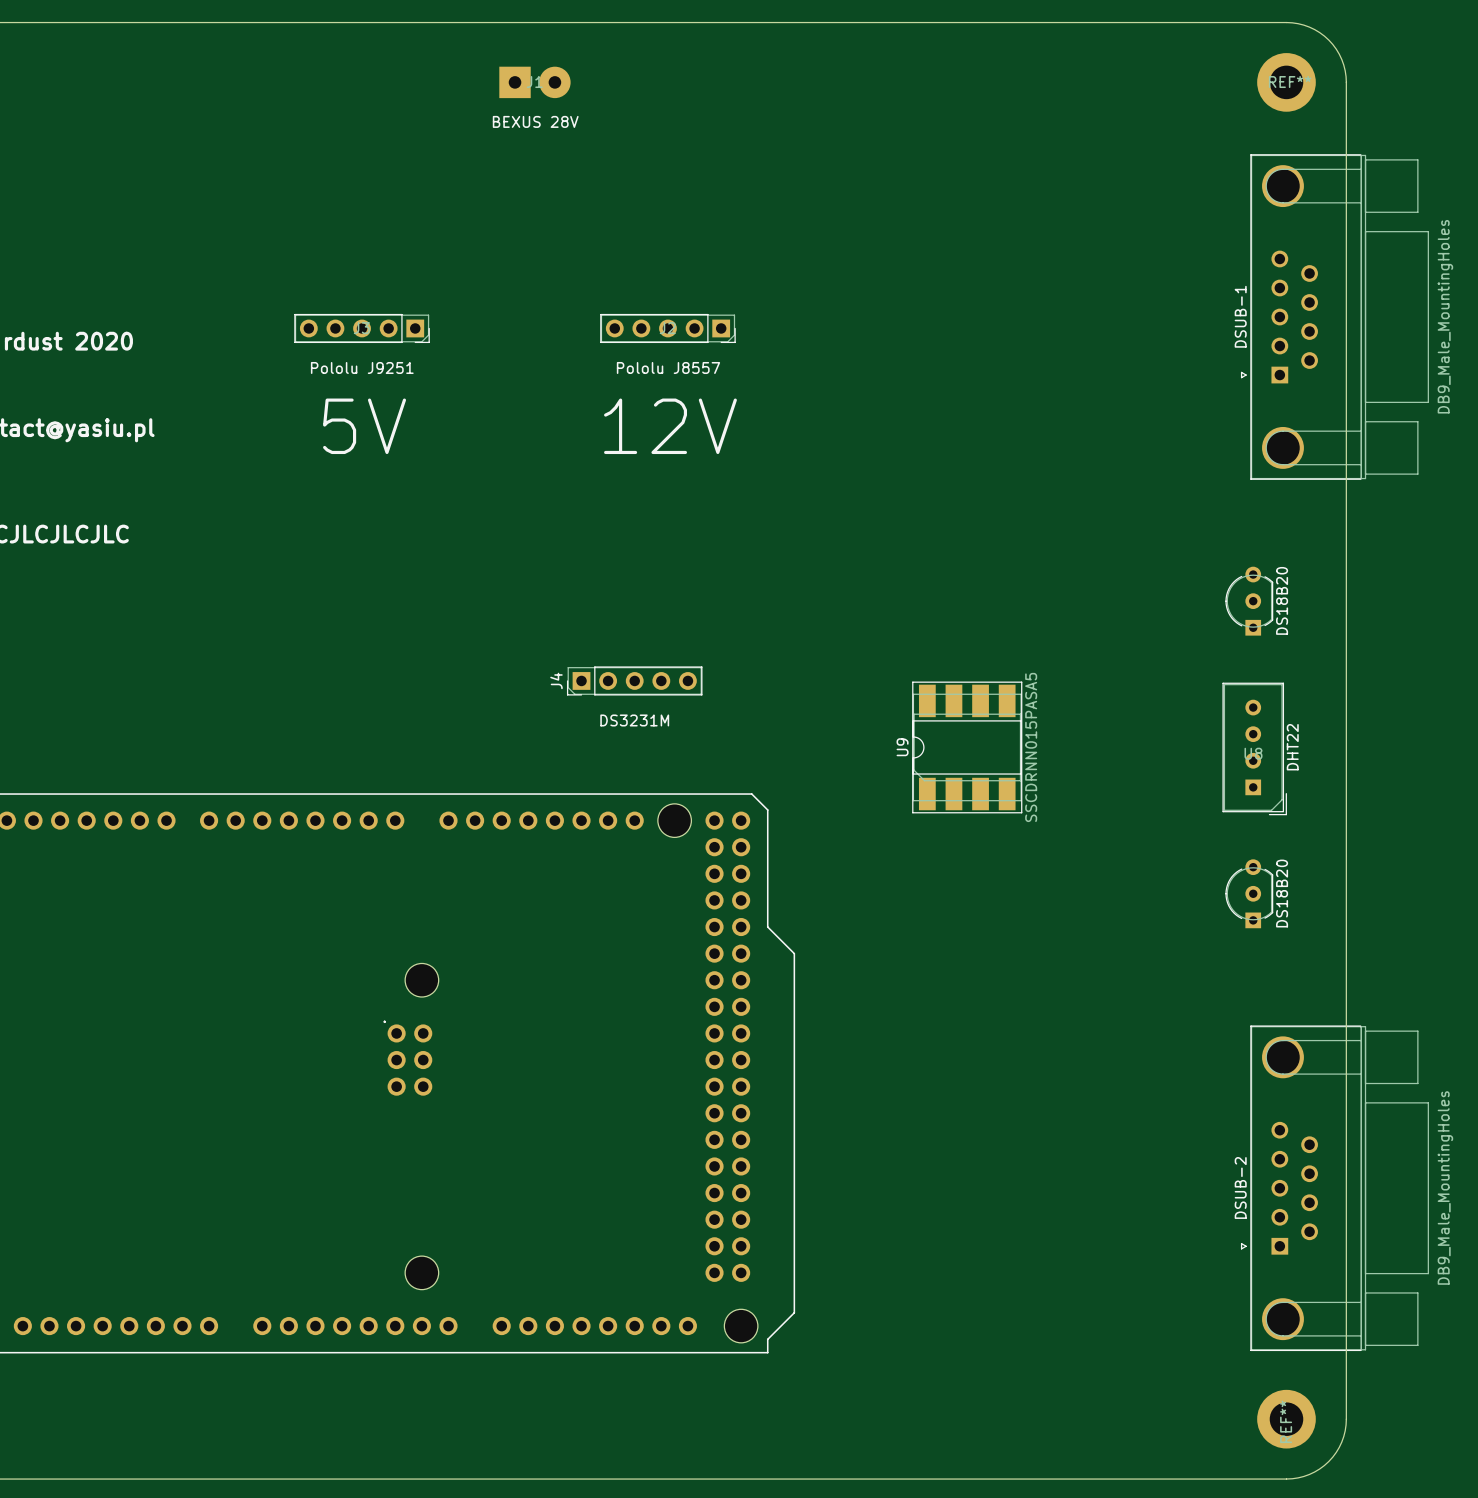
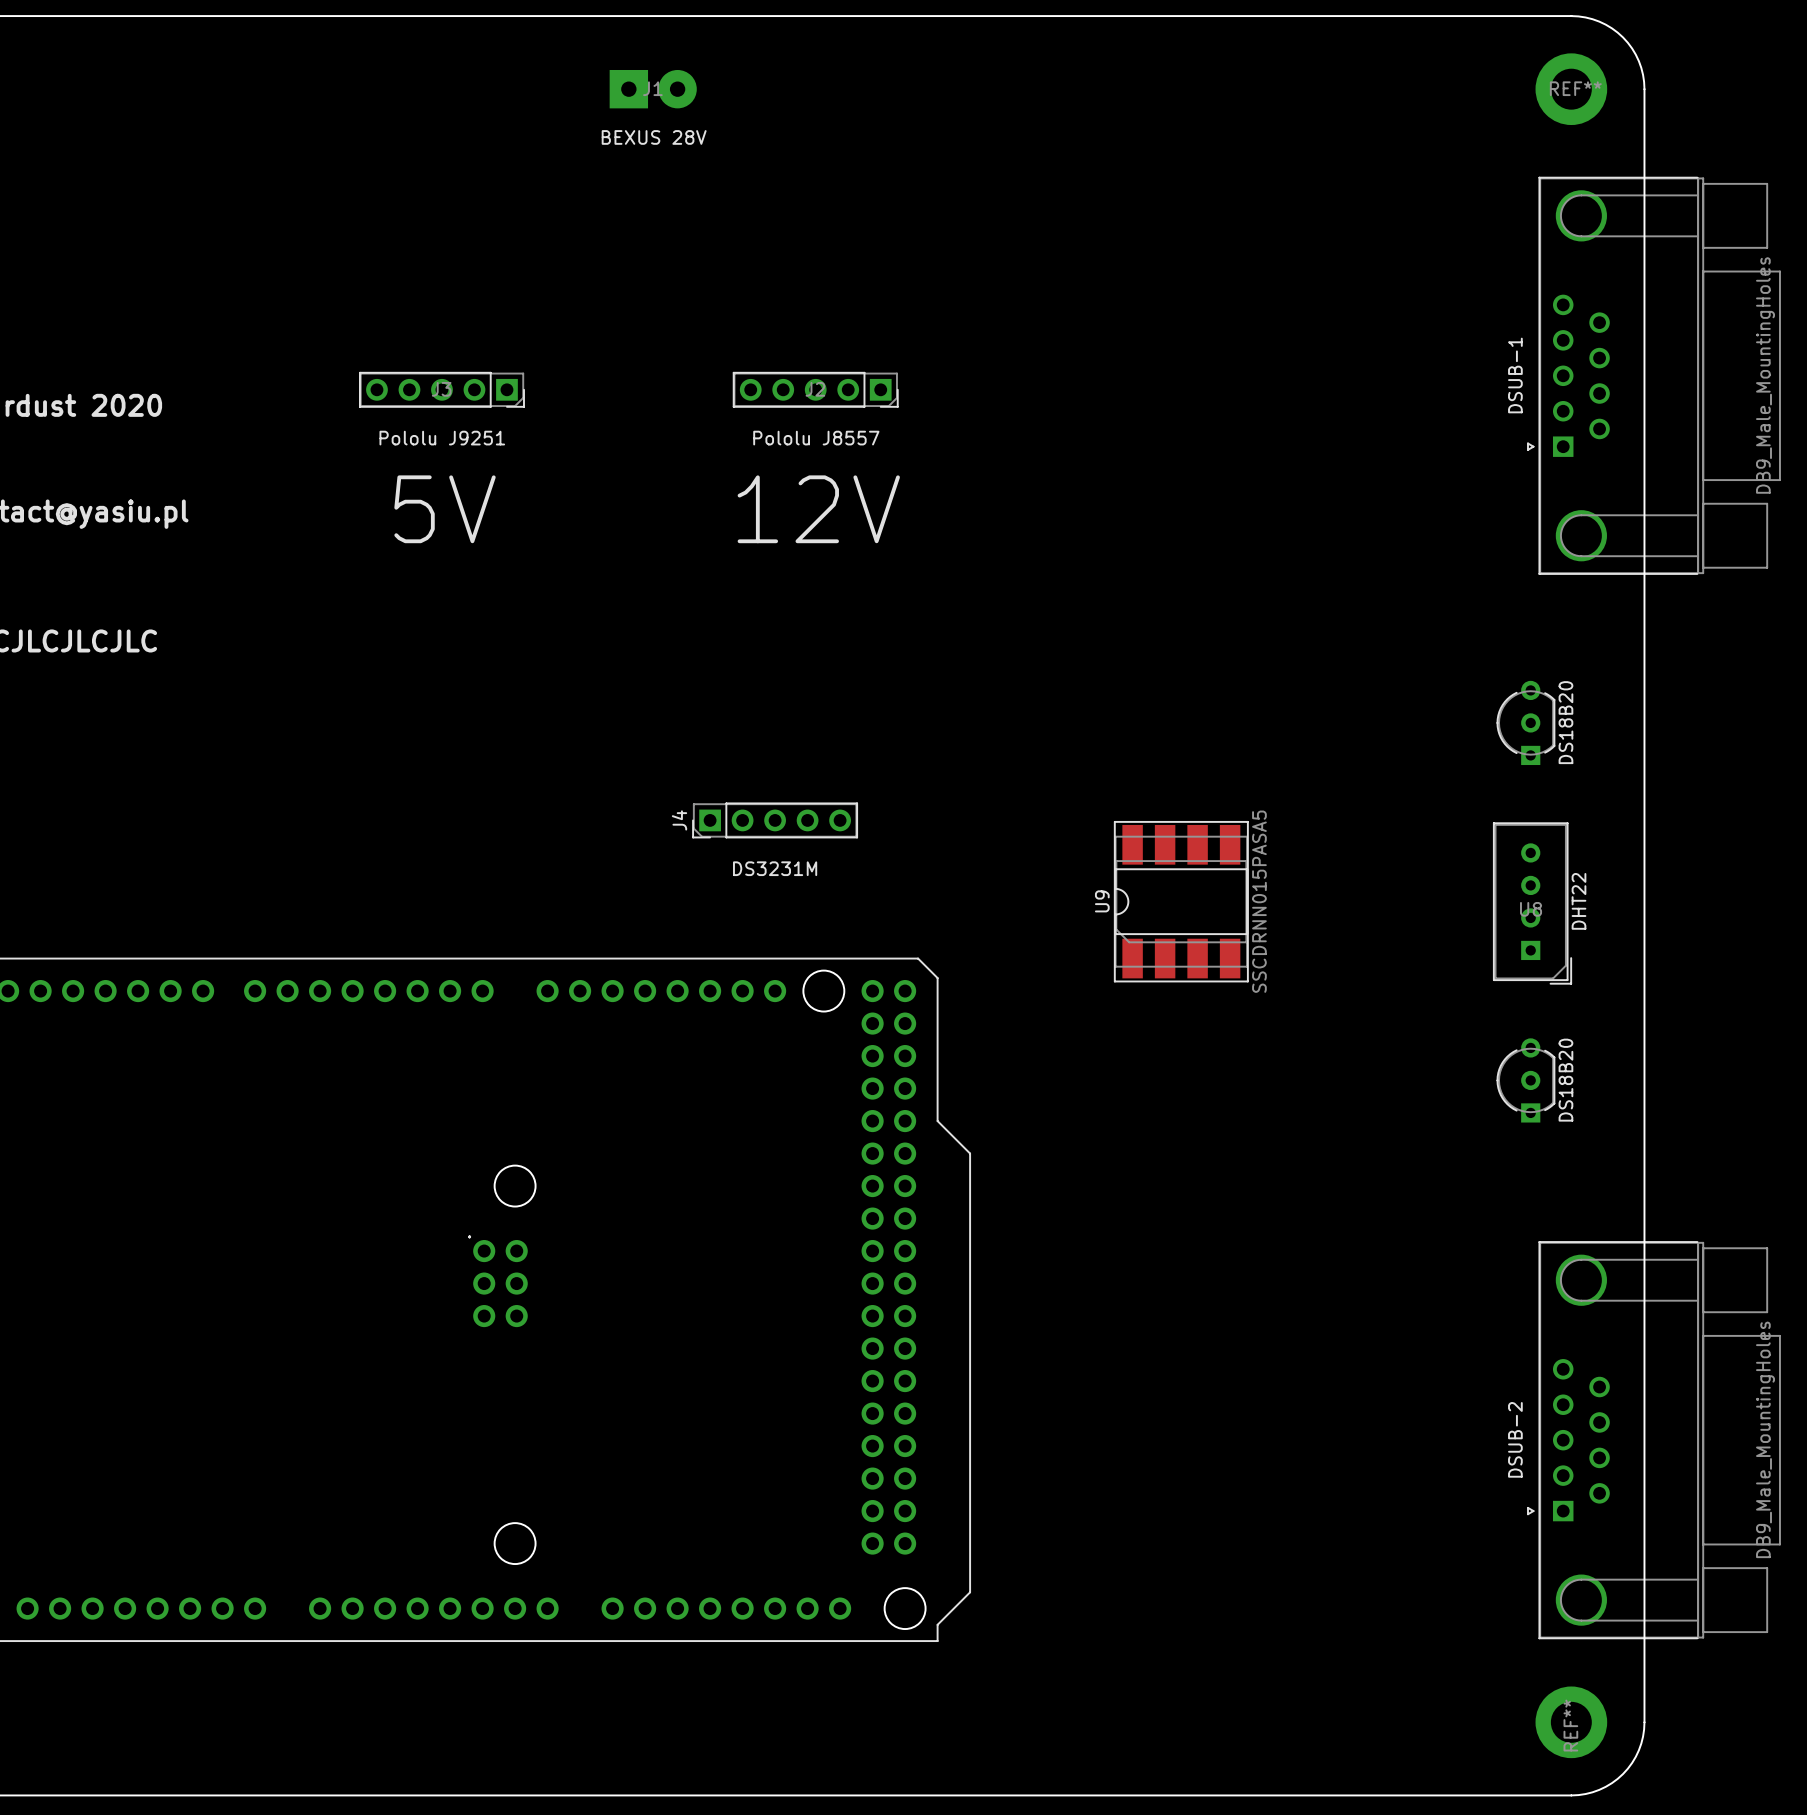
DSUB-1 footprint: [1240, 154, 1429, 480] -> [1527, 176, 1781, 575]
DSUB-2 footprint: [1240, 1025, 1429, 1352] -> [1527, 1241, 1781, 1640]

